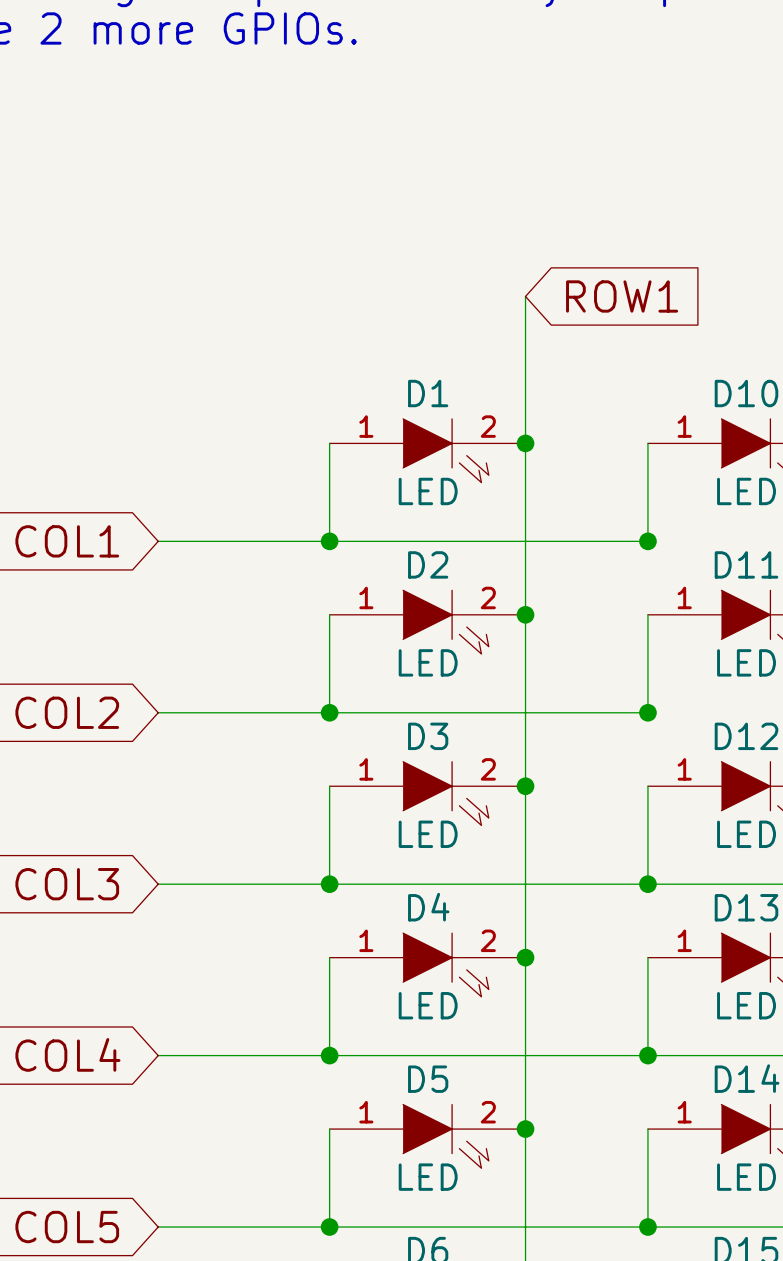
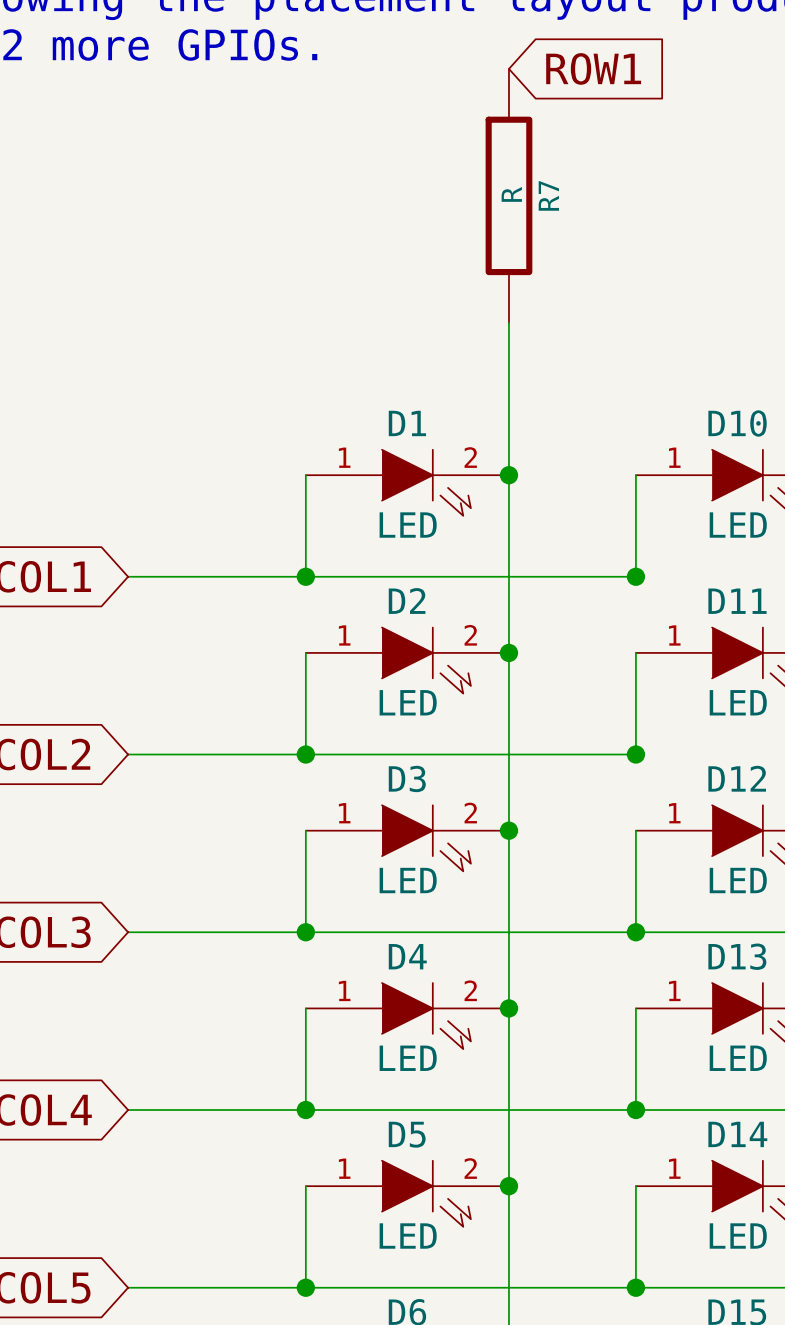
R7: none -> R (508, 195)
global label position: ROW1 (622, 296) -> ROW1 (593, 68)

